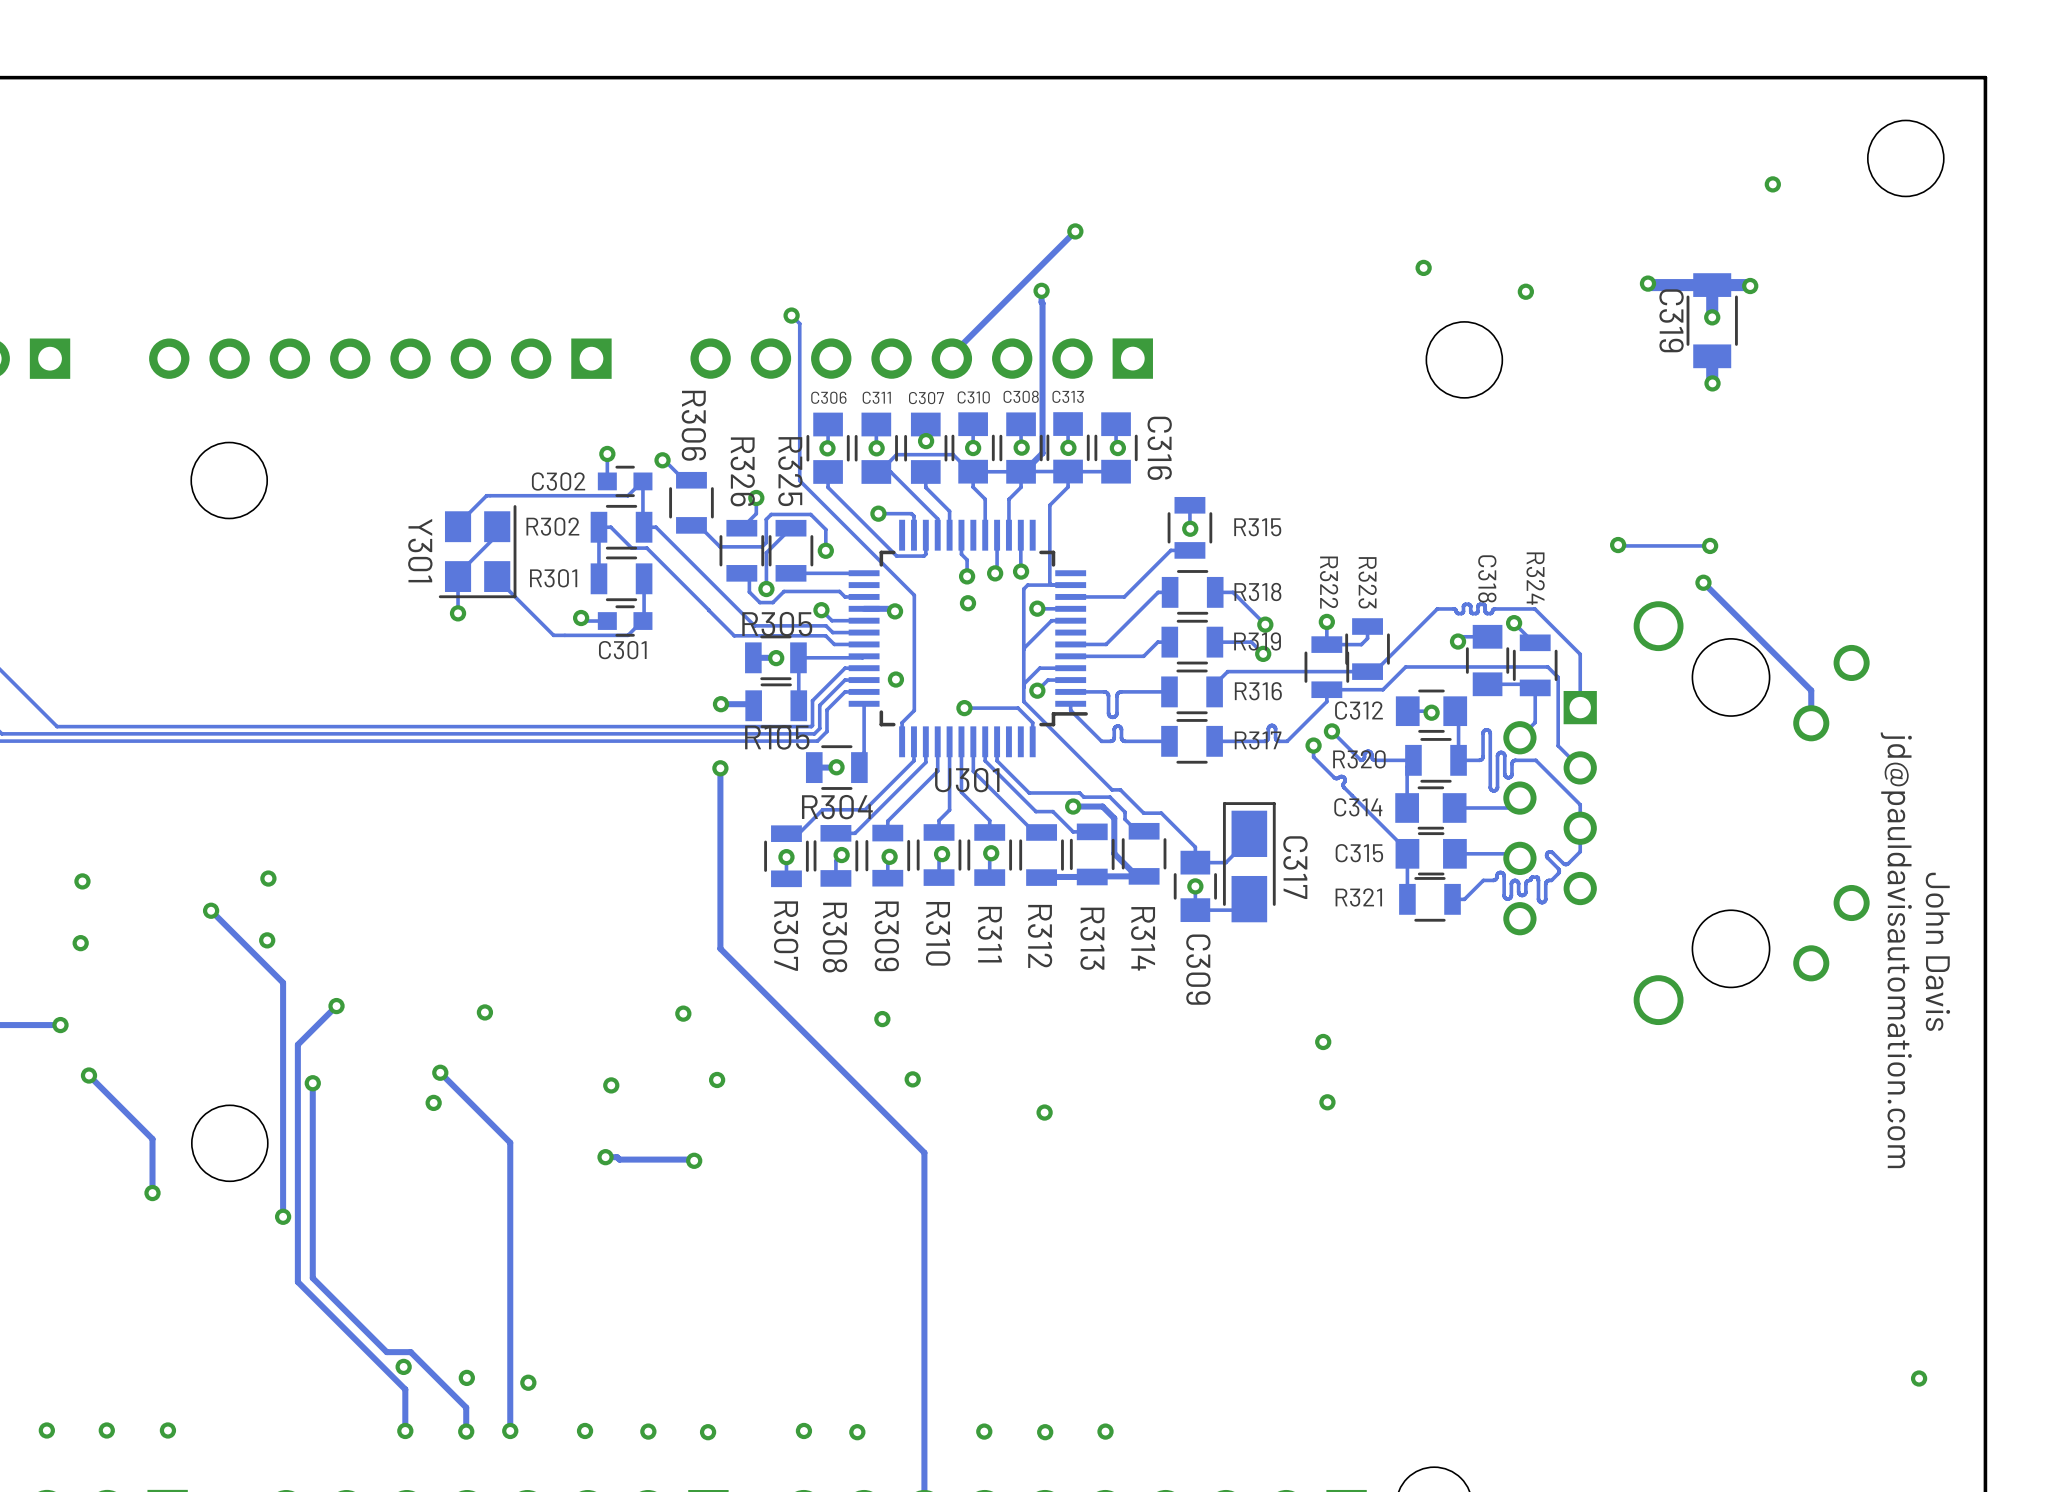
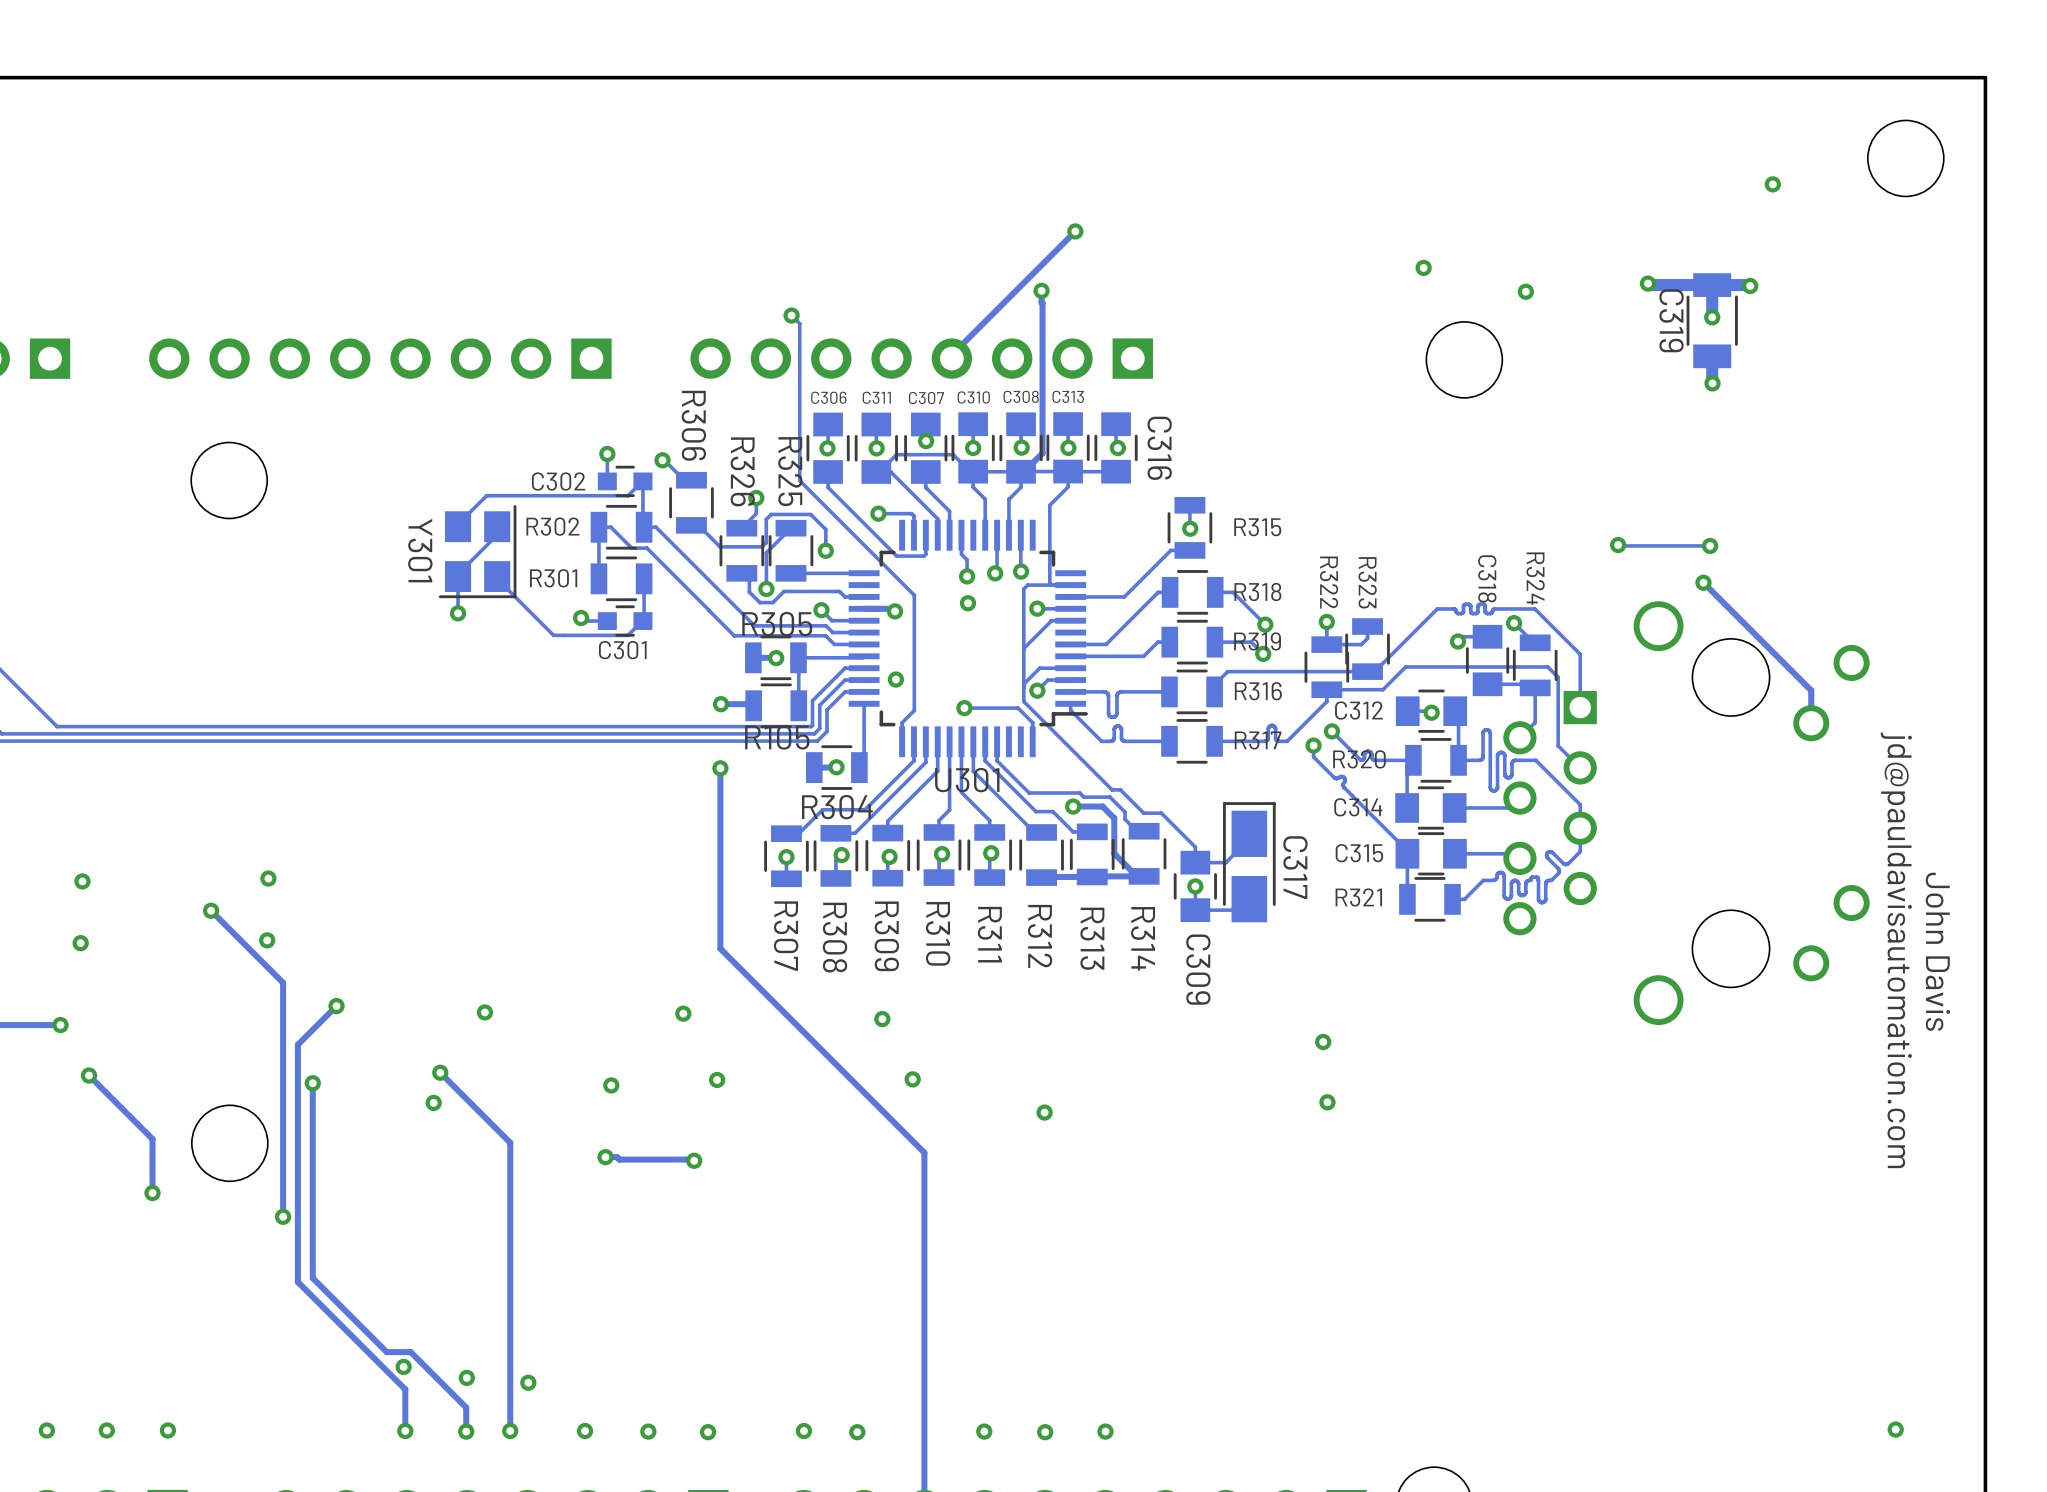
via position: (1919, 1378) -> (1895, 1429)

